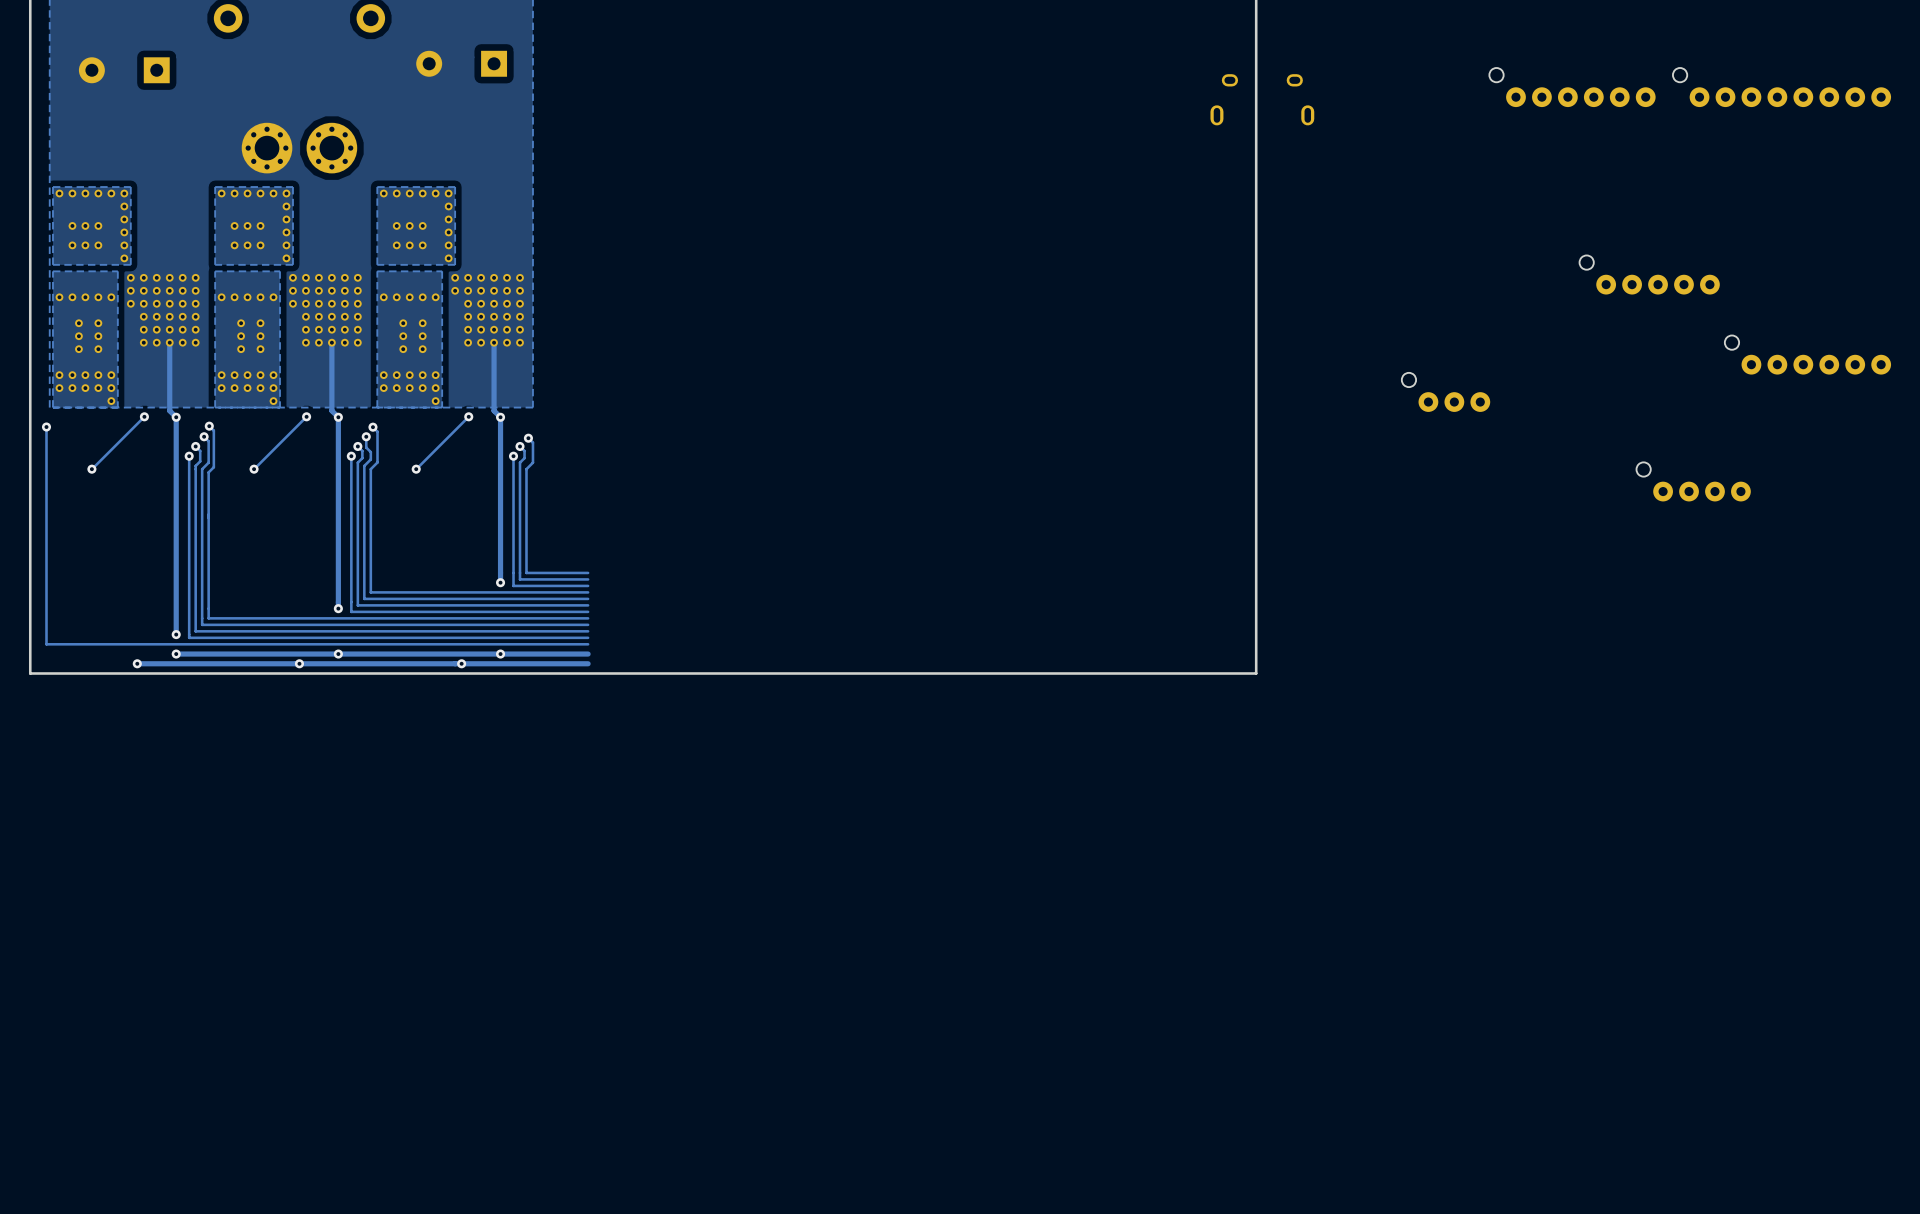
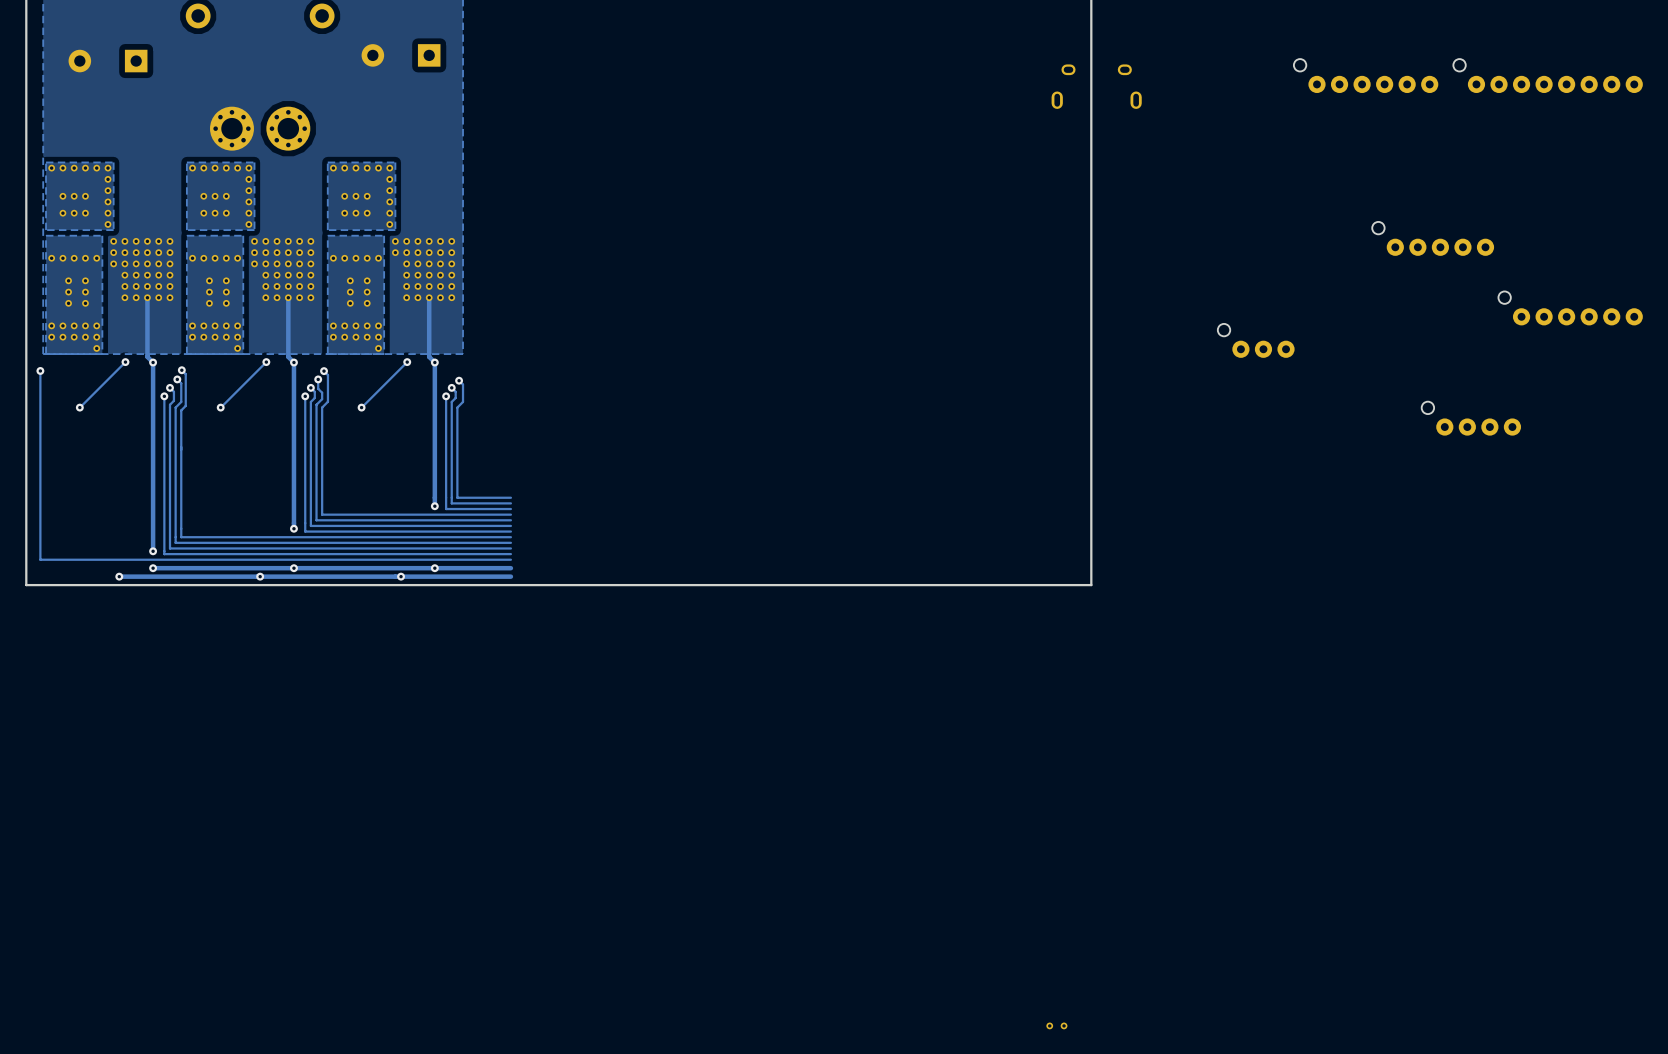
part: none -> (1049, 1025)
part: none -> (1064, 1025)

